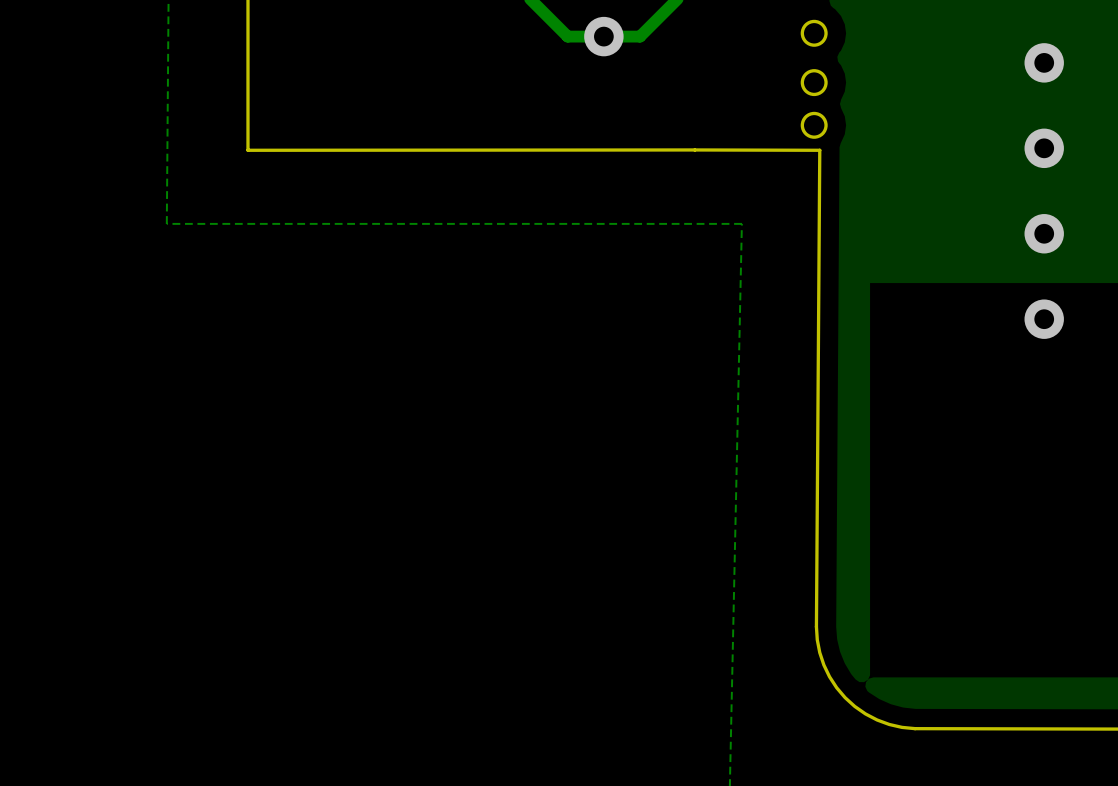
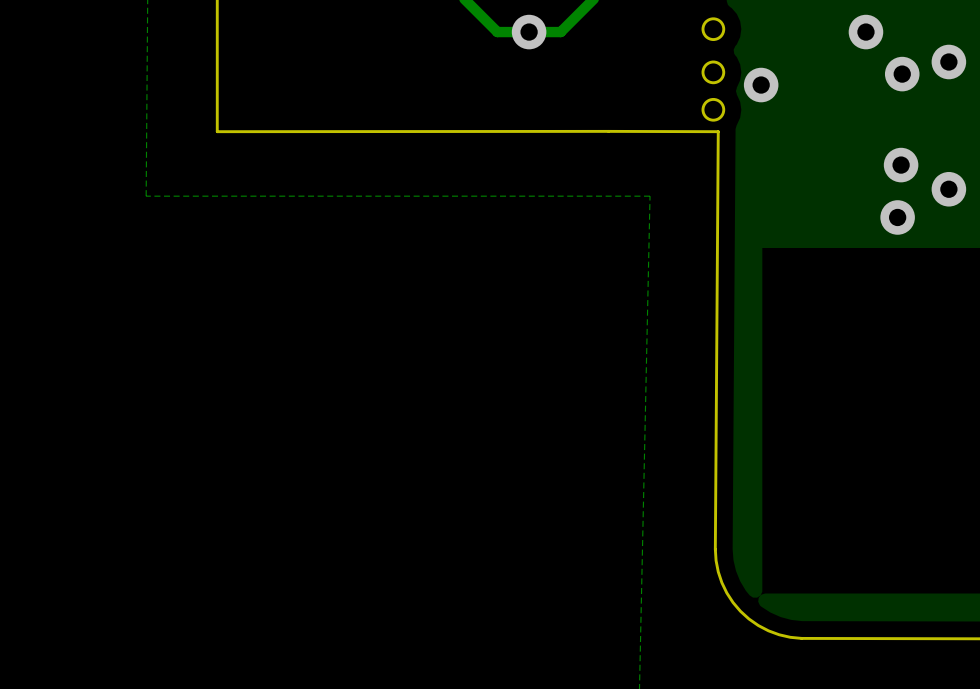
via: none -> (865, 32)
via: (1044, 62) -> none
via: none -> (948, 62)
via: none -> (902, 74)
via: none -> (761, 85)
via: (1044, 148) -> none
via: none -> (901, 165)
via: none -> (948, 189)
via: (1044, 233) -> none
via: none -> (897, 217)
via: (1044, 319) -> none

